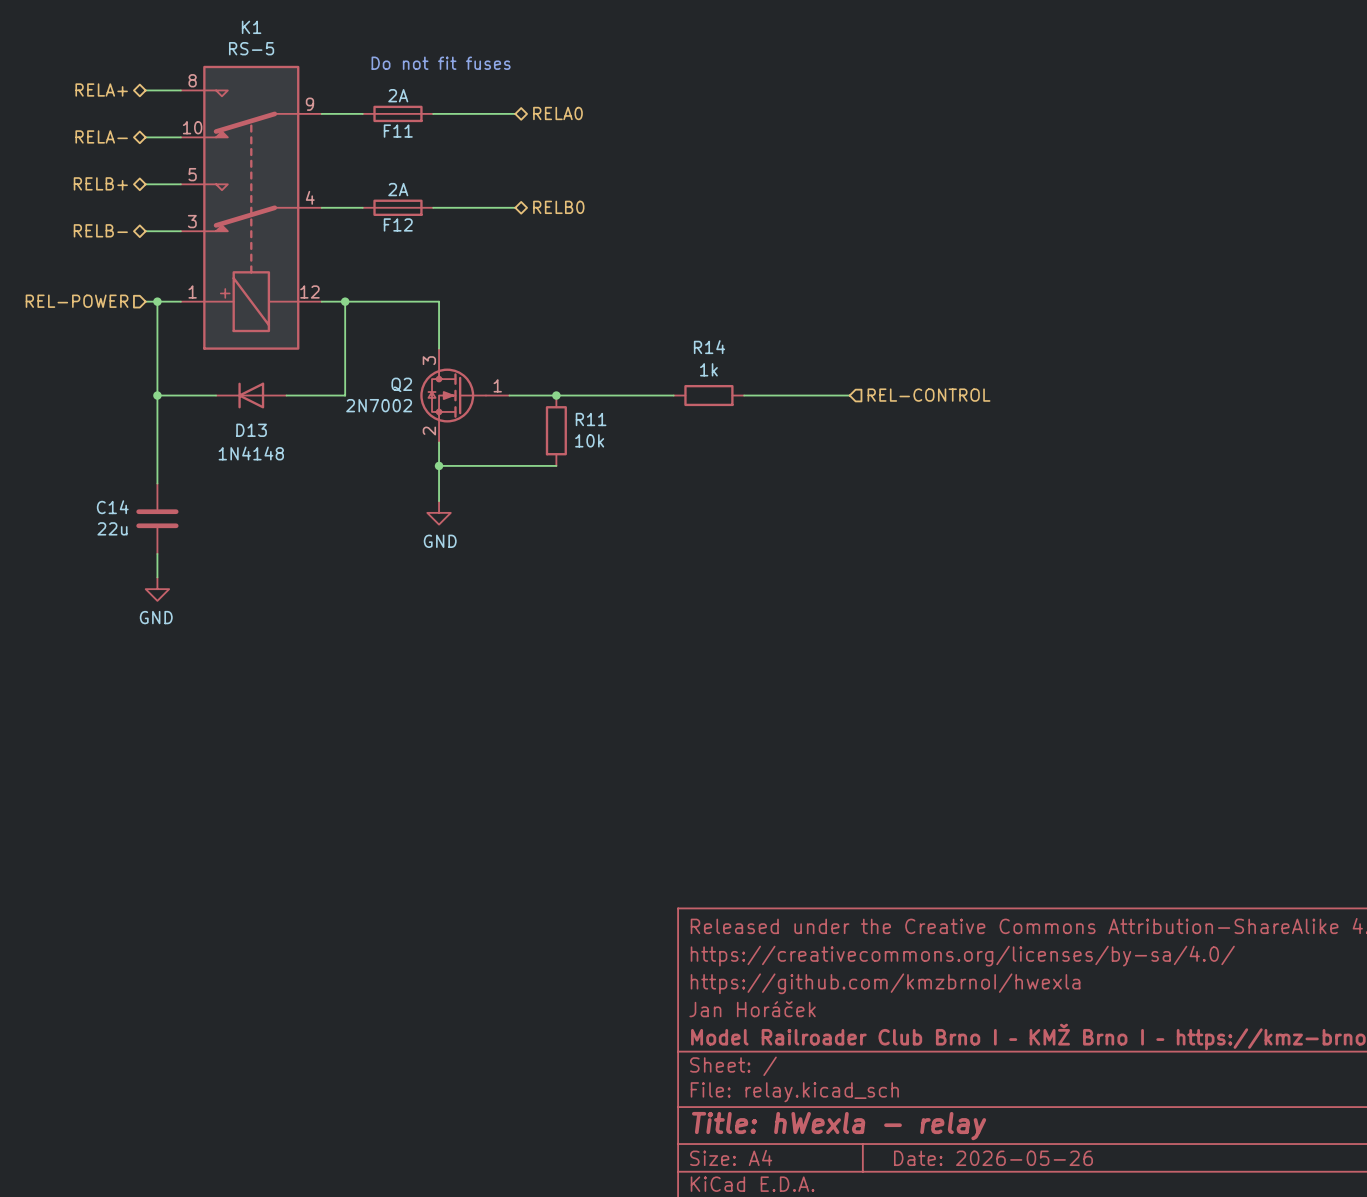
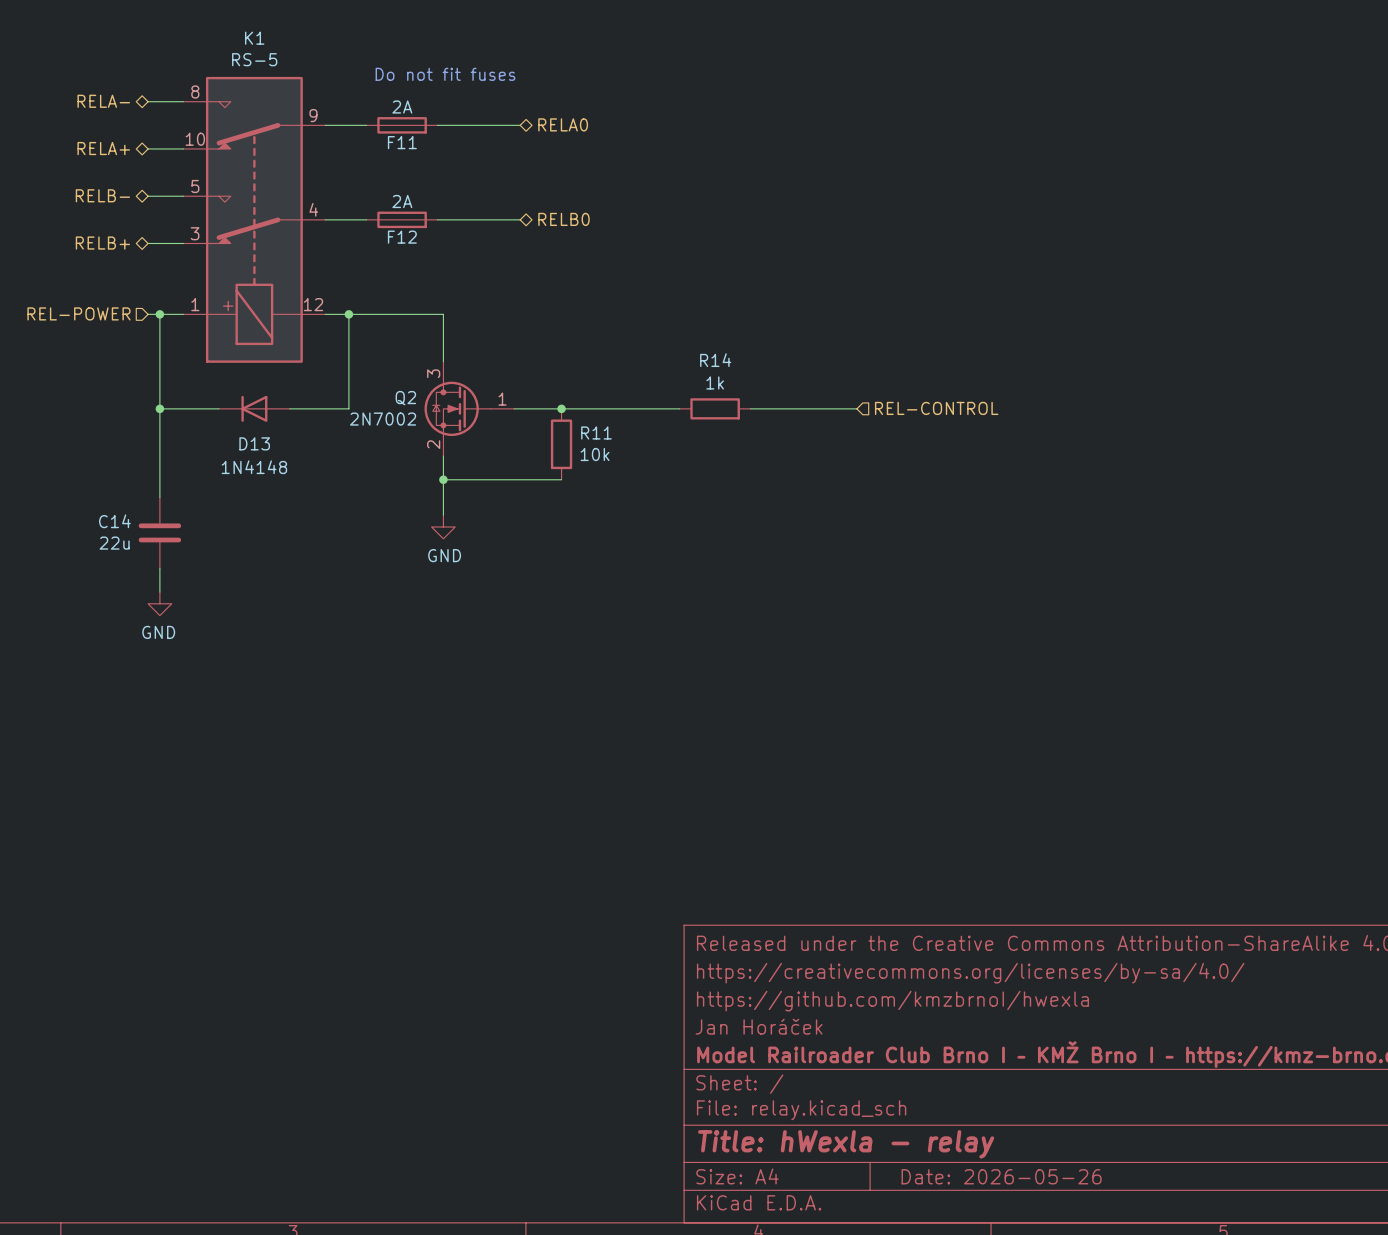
hierarchical label: RELA+ (101, 90) -> RELA- (103, 101)
hierarchical label: RELA- (101, 136) -> RELA+ (103, 148)
hierarchical label: RELB+ (100, 183) -> RELB- (102, 195)
hierarchical label: RELB- (100, 230) -> RELB+ (102, 243)

